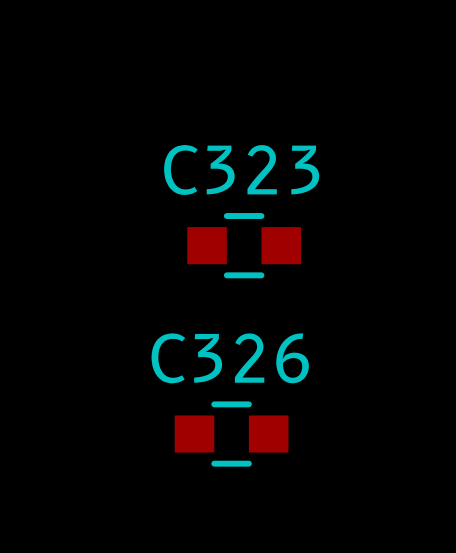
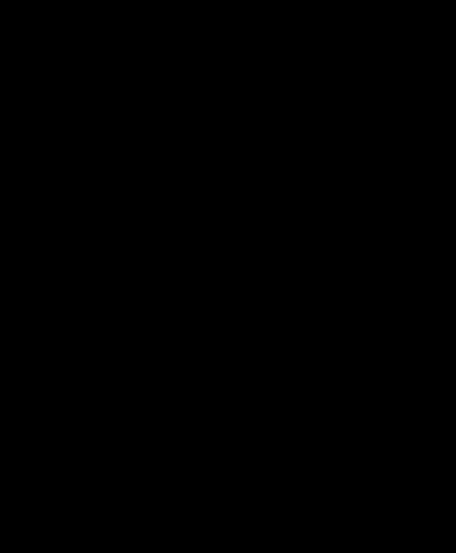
C323: (244, 245) -> none
C326: (231, 434) -> none

